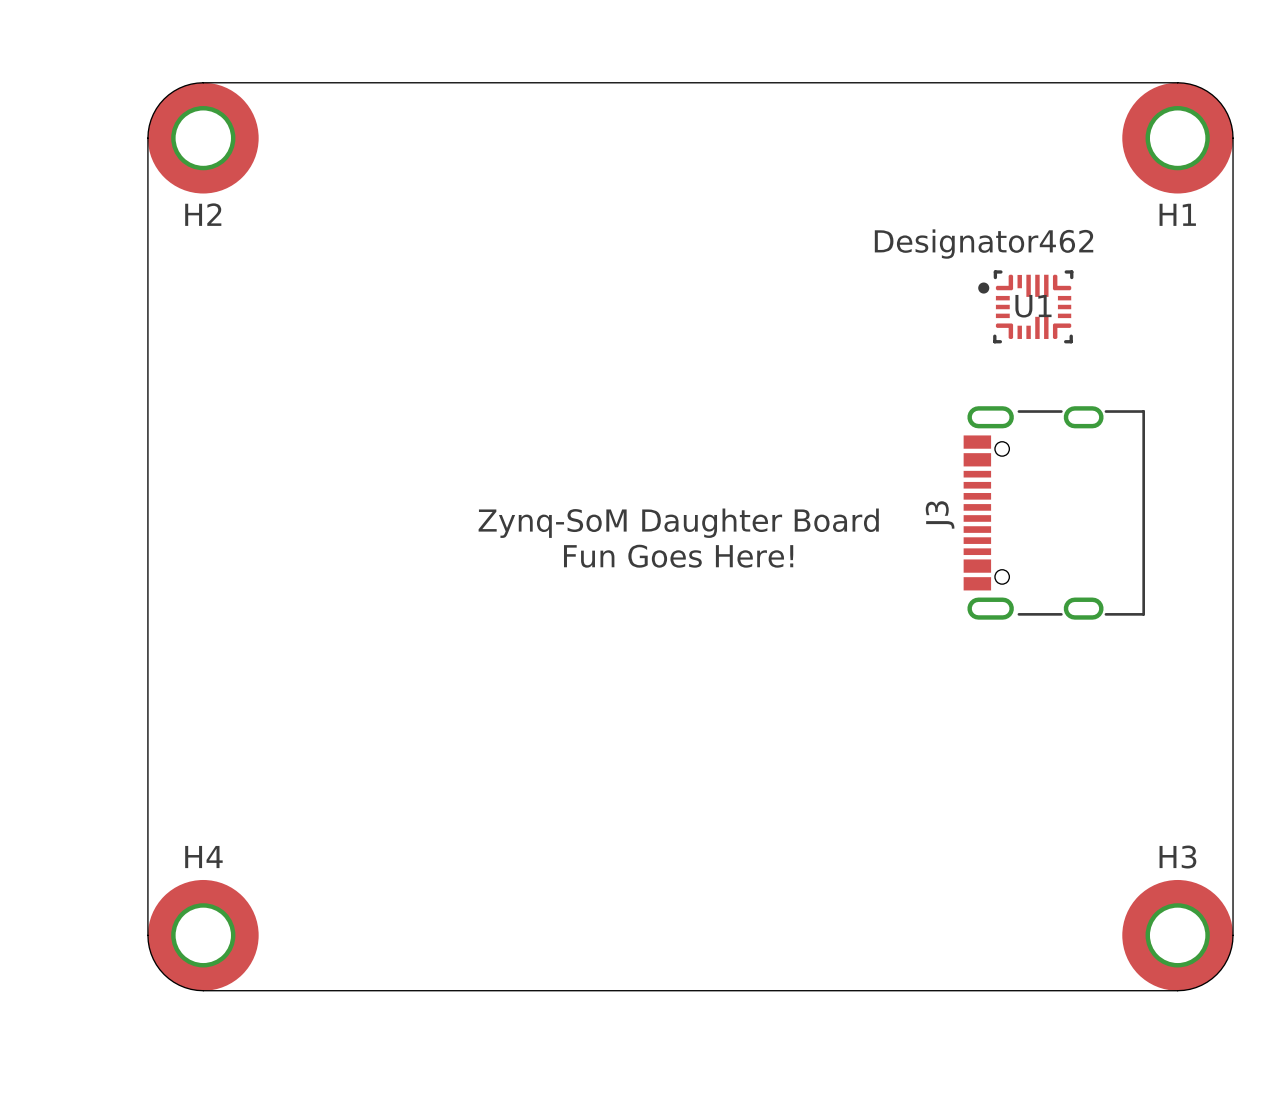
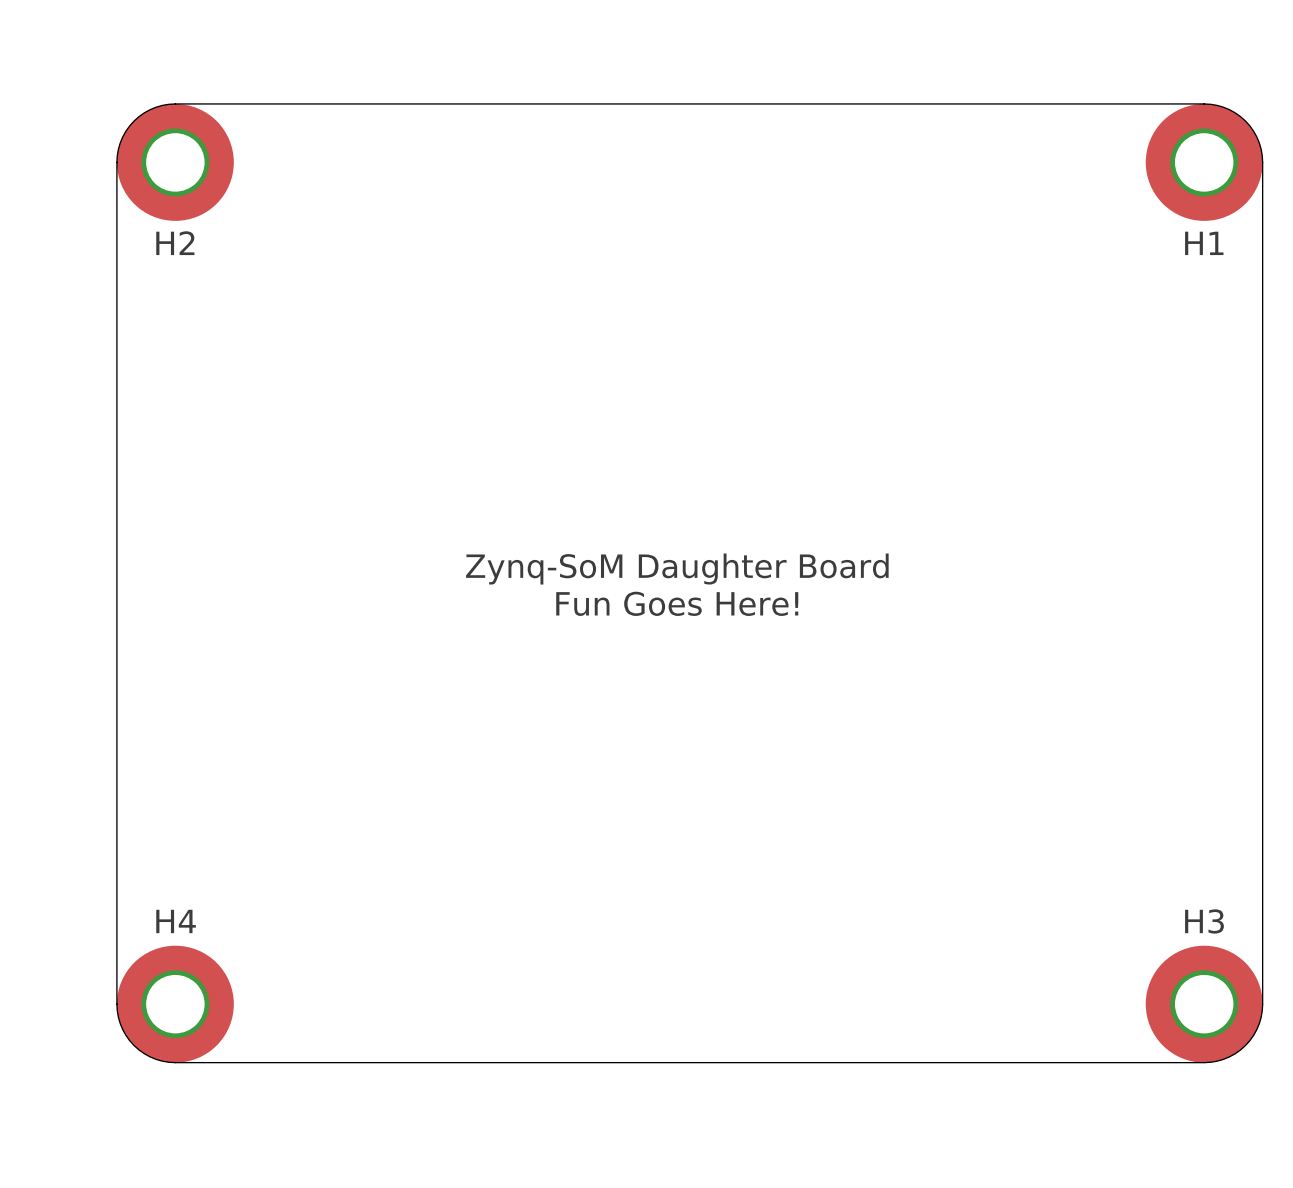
U1: (1025, 306) -> none
J3: (1054, 512) -> none

